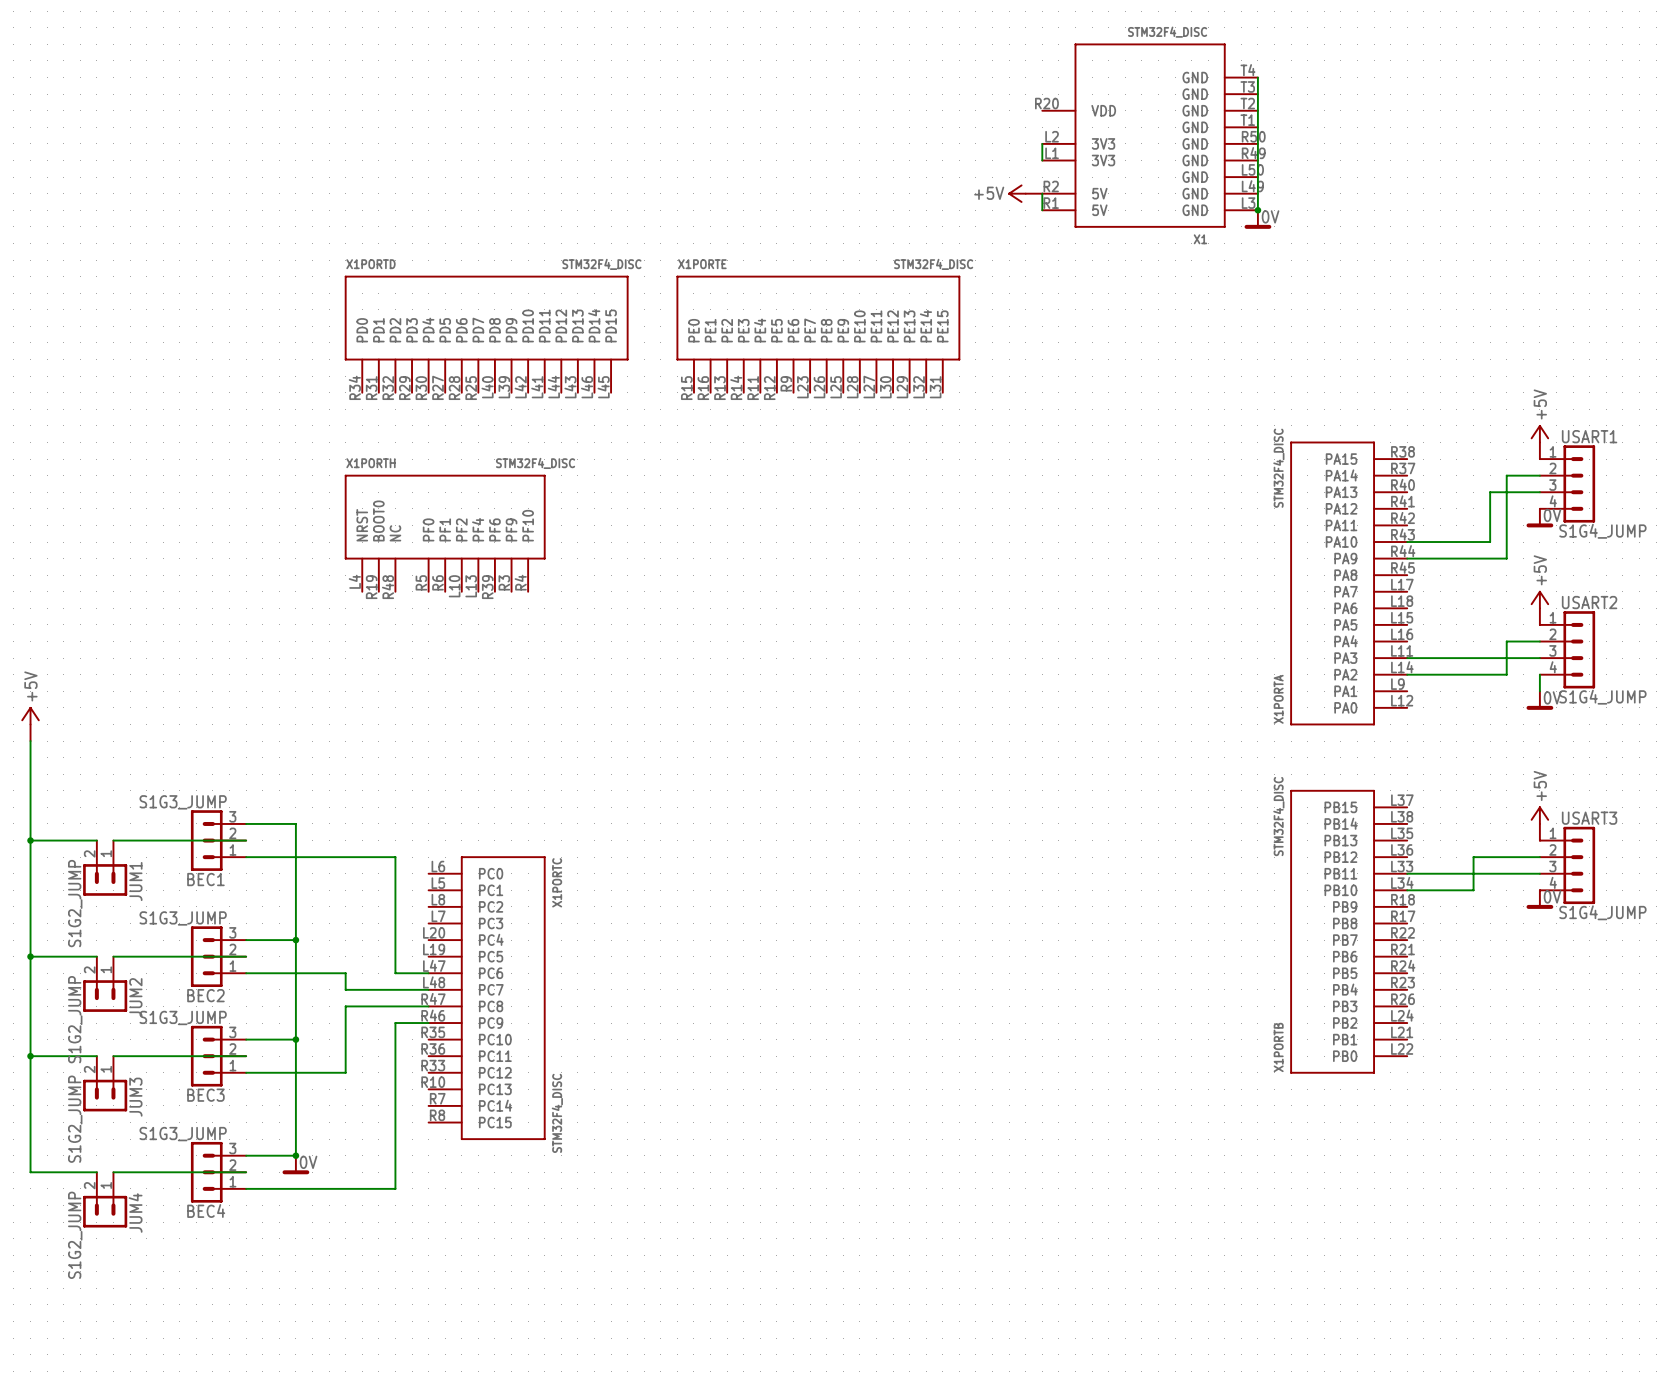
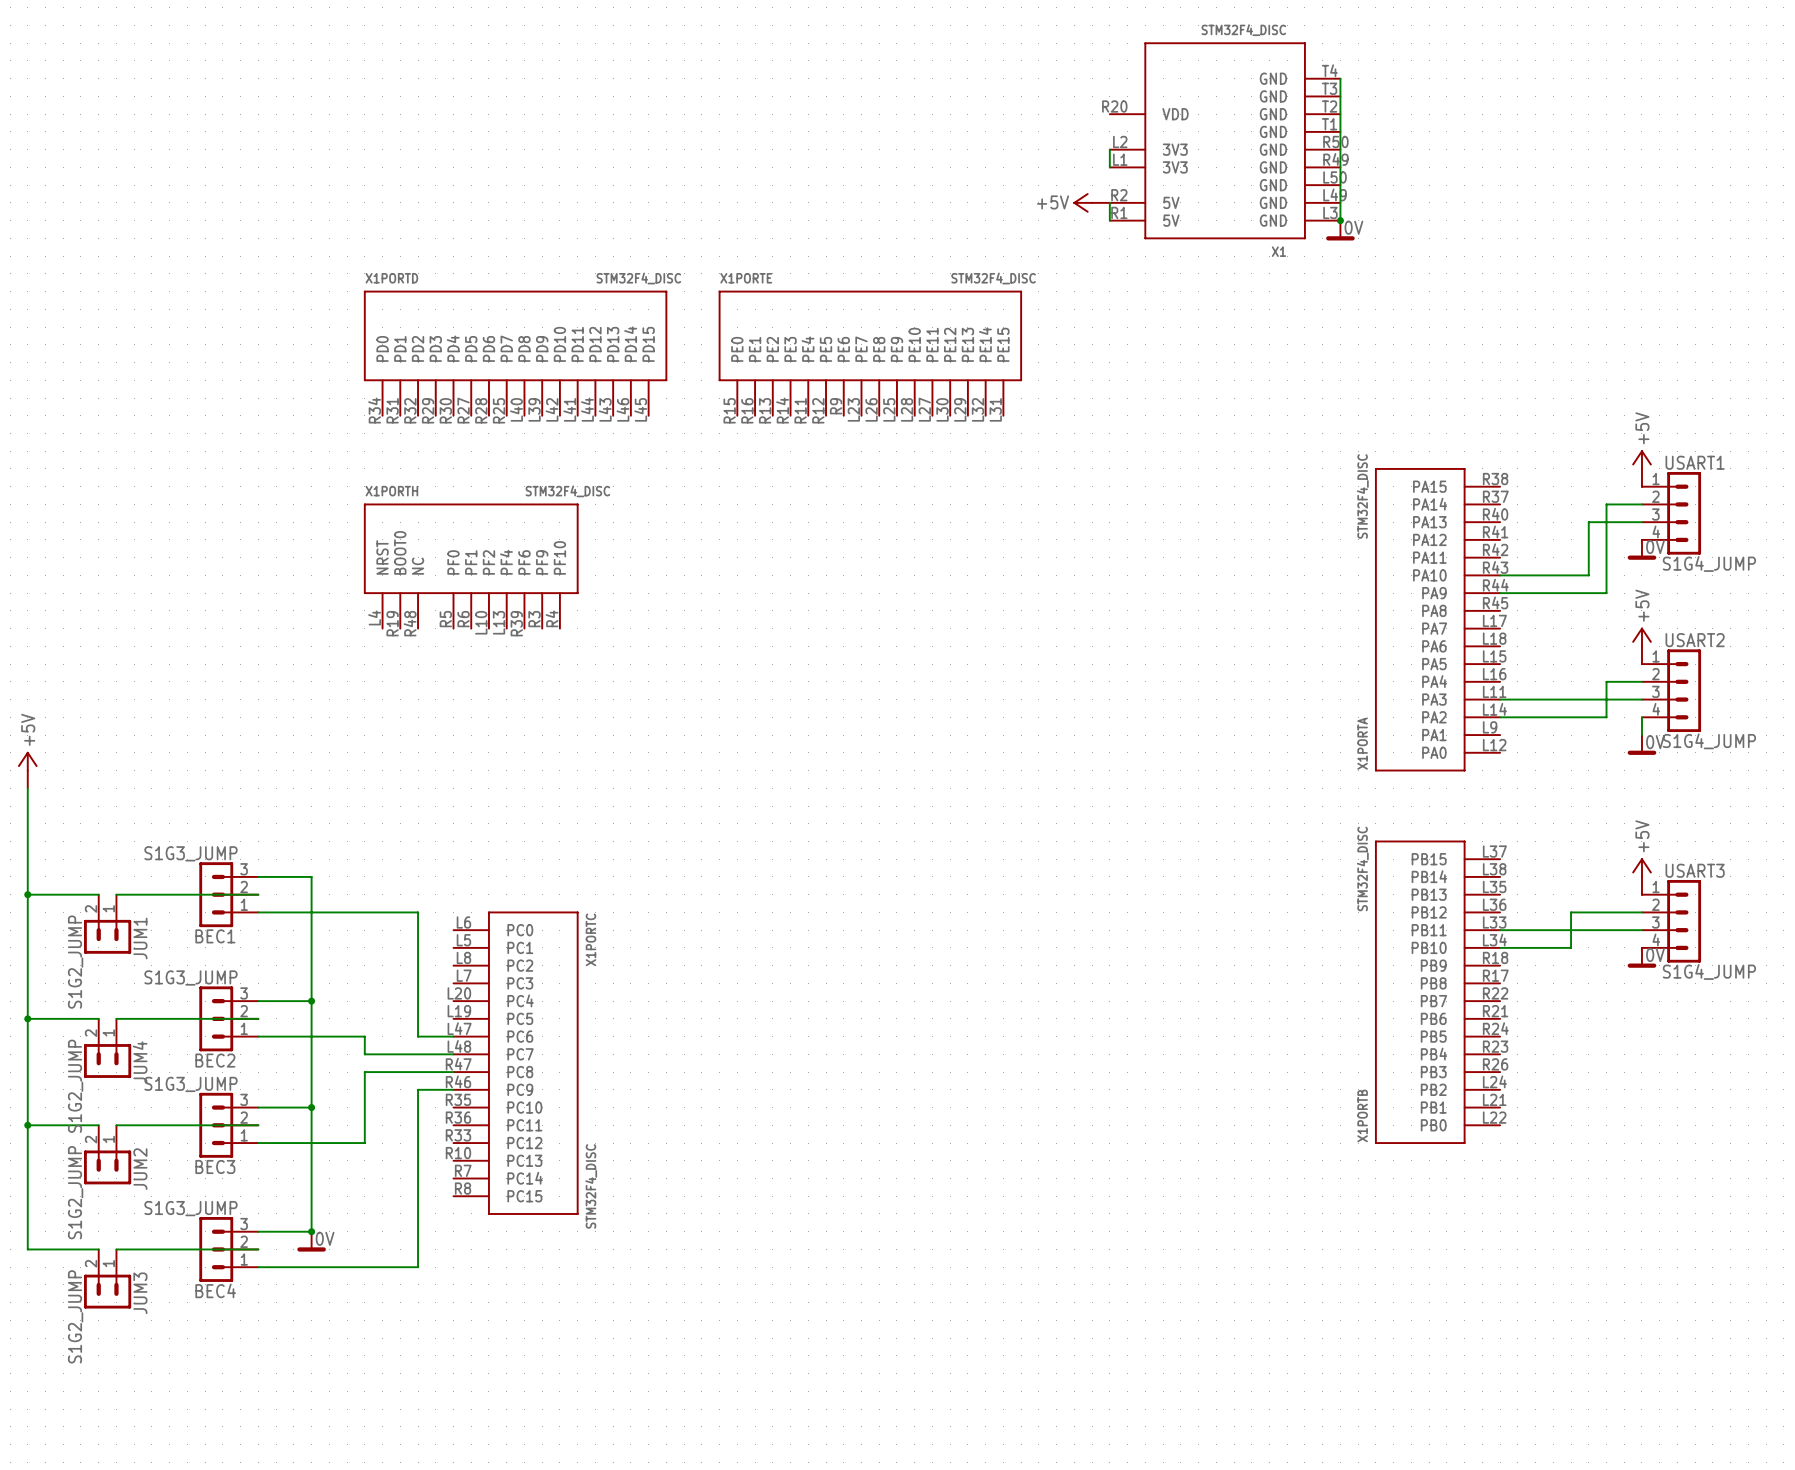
JUM2 name: JUM2 (135, 997) -> JUM4 (140, 1062)
JUM3 name: JUM3 (135, 1097) -> JUM2 (140, 1169)
JUM4 name: JUM4 (135, 1213) -> JUM3 (140, 1293)

